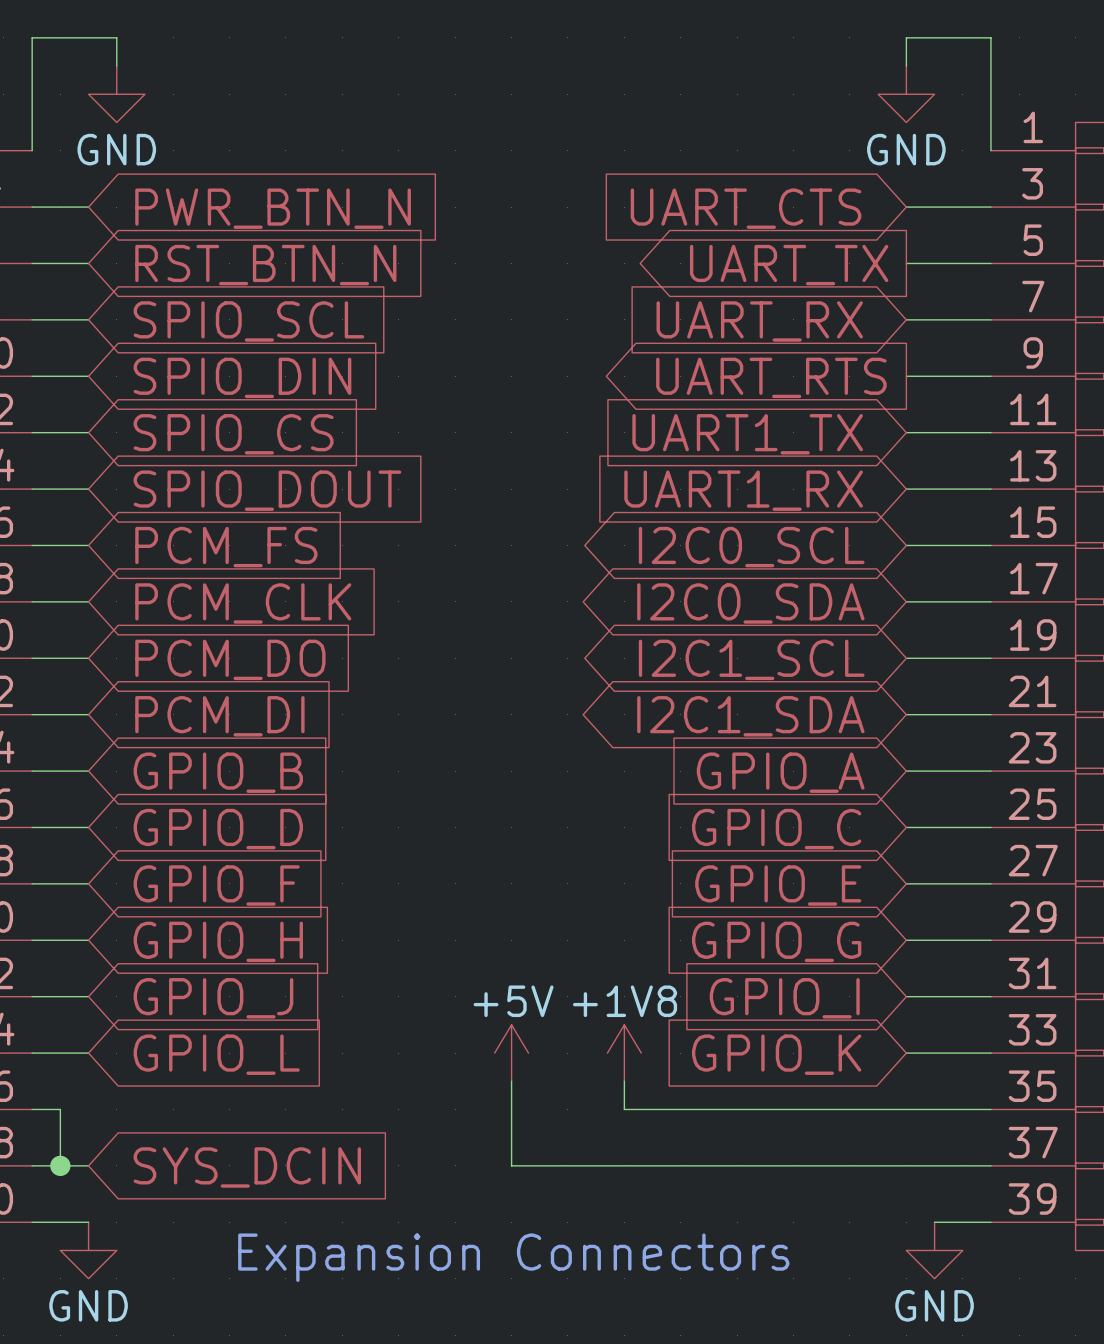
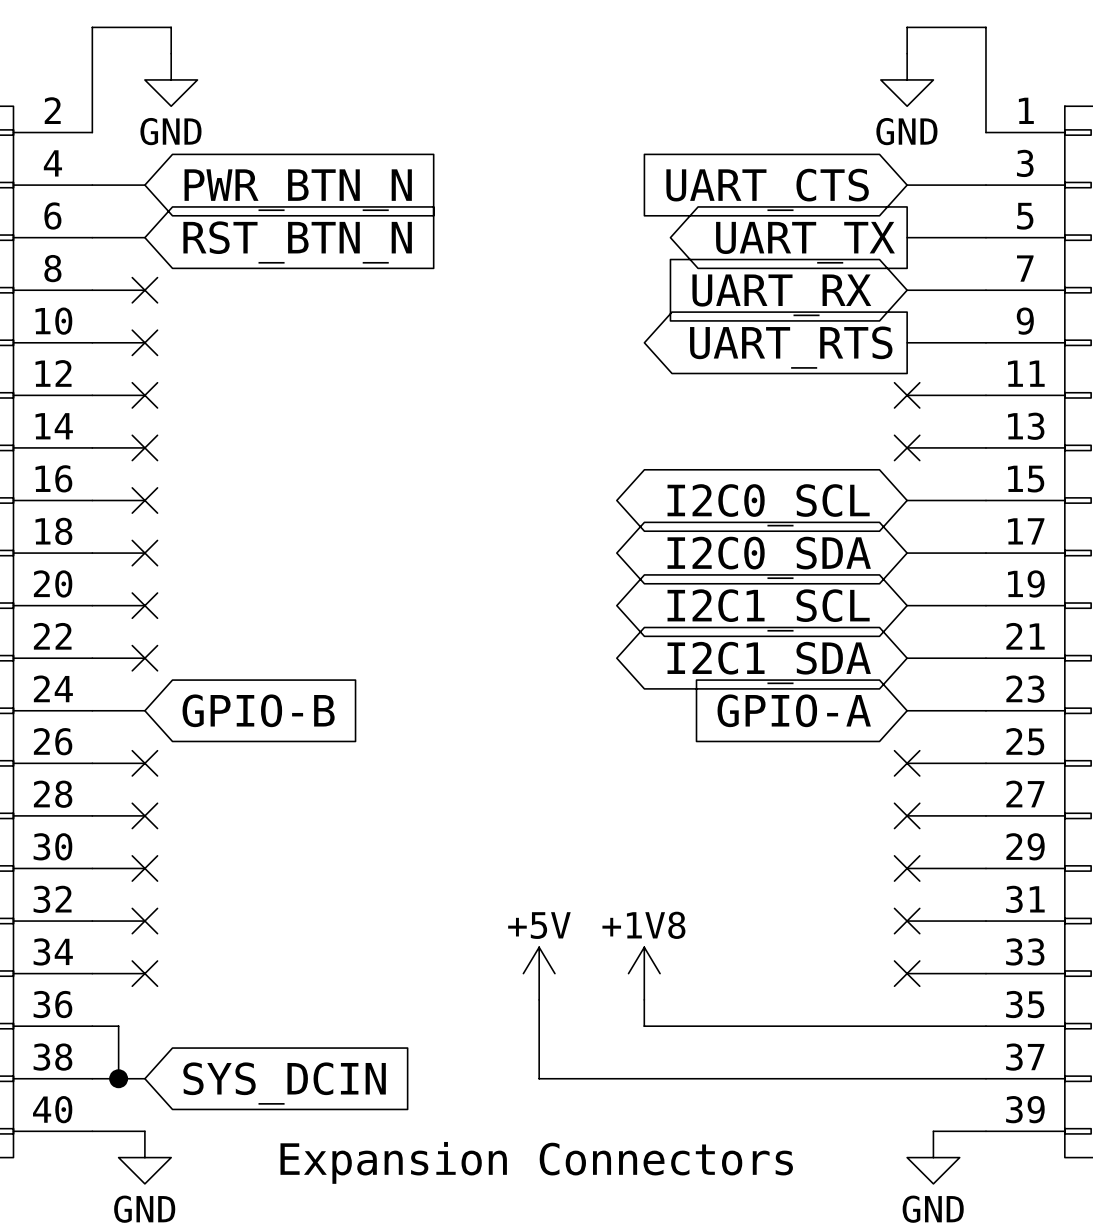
no-connect mark: none -> (144, 290)
global label: SPIO_SCL (248, 321) -> none
no-connect mark: none -> (144, 342)
global label: SPIO_DIN (242, 377) -> none
no-connect mark: none -> (144, 395)
no-connect mark: none -> (907, 395)
global label: SPIO_CS (233, 434) -> none
global label: UART1_TX (747, 434) -> none
no-connect mark: none -> (144, 447)
no-connect mark: none -> (907, 447)
global label: SPIO_DOUT (267, 490) -> none
global label: UART1_RX (743, 490) -> none
no-connect mark: none -> (144, 500)
global label: PCM_FS (226, 547) -> none
no-connect mark: none -> (144, 553)
global label: PCM_CLK (243, 603) -> none
no-connect mark: none -> (144, 605)
global label: PCM_DO (230, 659) -> none
no-connect mark: none -> (144, 658)
global label: PCM_DI (219, 716) -> none
global label: GPIO_B (218, 772) -> GPIO-B (258, 710)
global label: GPIO_A (780, 772) -> GPIO-A (794, 710)
no-connect mark: none -> (144, 763)
no-connect mark: none -> (907, 763)
global label: GPIO_D (218, 829) -> none
global label: GPIO_C (776, 829) -> none
no-connect mark: none -> (144, 815)
no-connect mark: none -> (907, 815)
global label: GPIO_F (216, 885) -> none
global label: GPIO_E (778, 885) -> none
no-connect mark: none -> (144, 868)
no-connect mark: none -> (907, 868)
global label: GPIO_H (218, 941) -> none
global label: GPIO_G (776, 941) -> none
no-connect mark: none -> (144, 921)
no-connect mark: none -> (907, 921)
global label: GPIO_J (213, 998) -> none
global label: GPIO_I (784, 998) -> none
no-connect mark: none -> (144, 973)
no-connect mark: none -> (907, 973)
global label: GPIO_L (216, 1054) -> none
global label: GPIO_K (776, 1054) -> none

